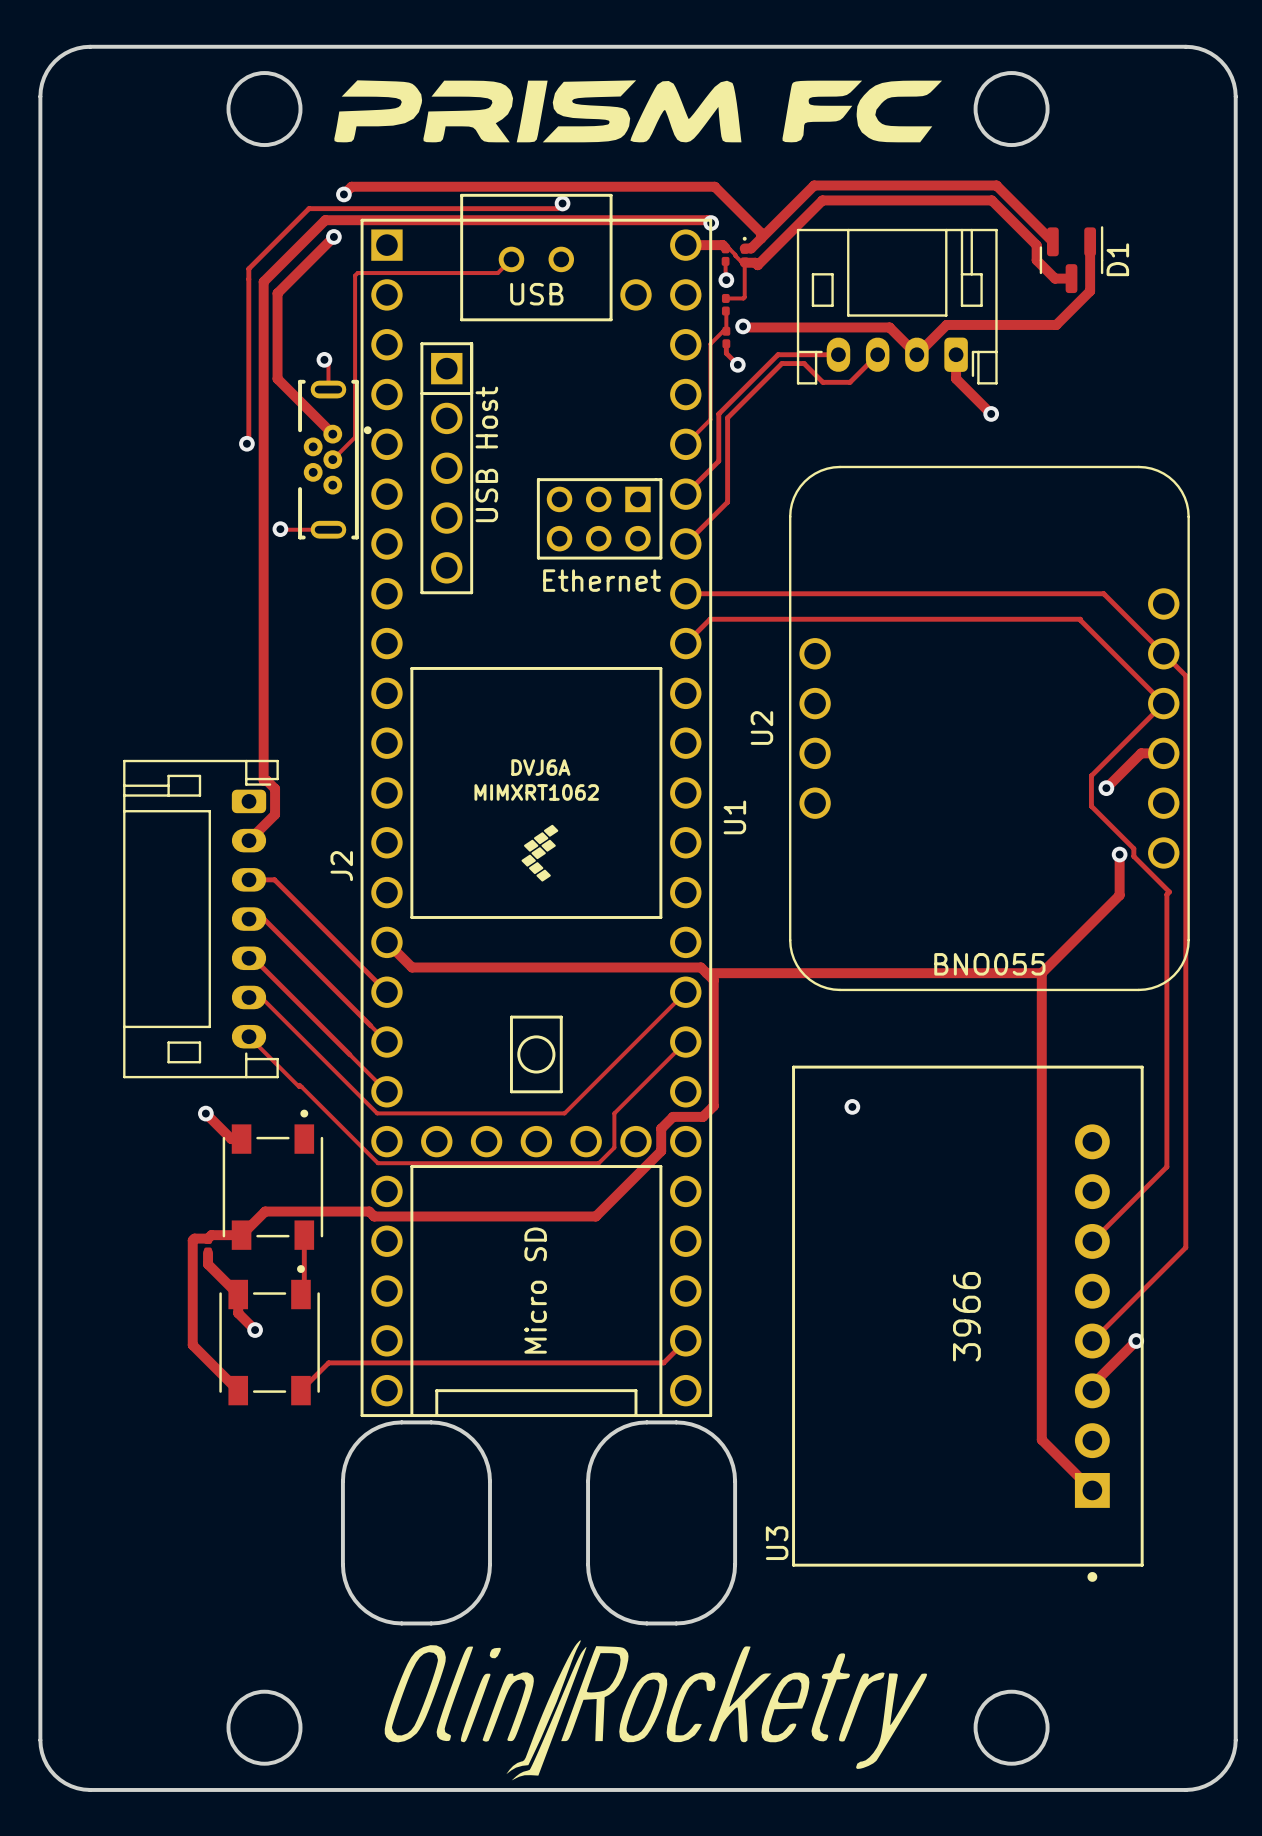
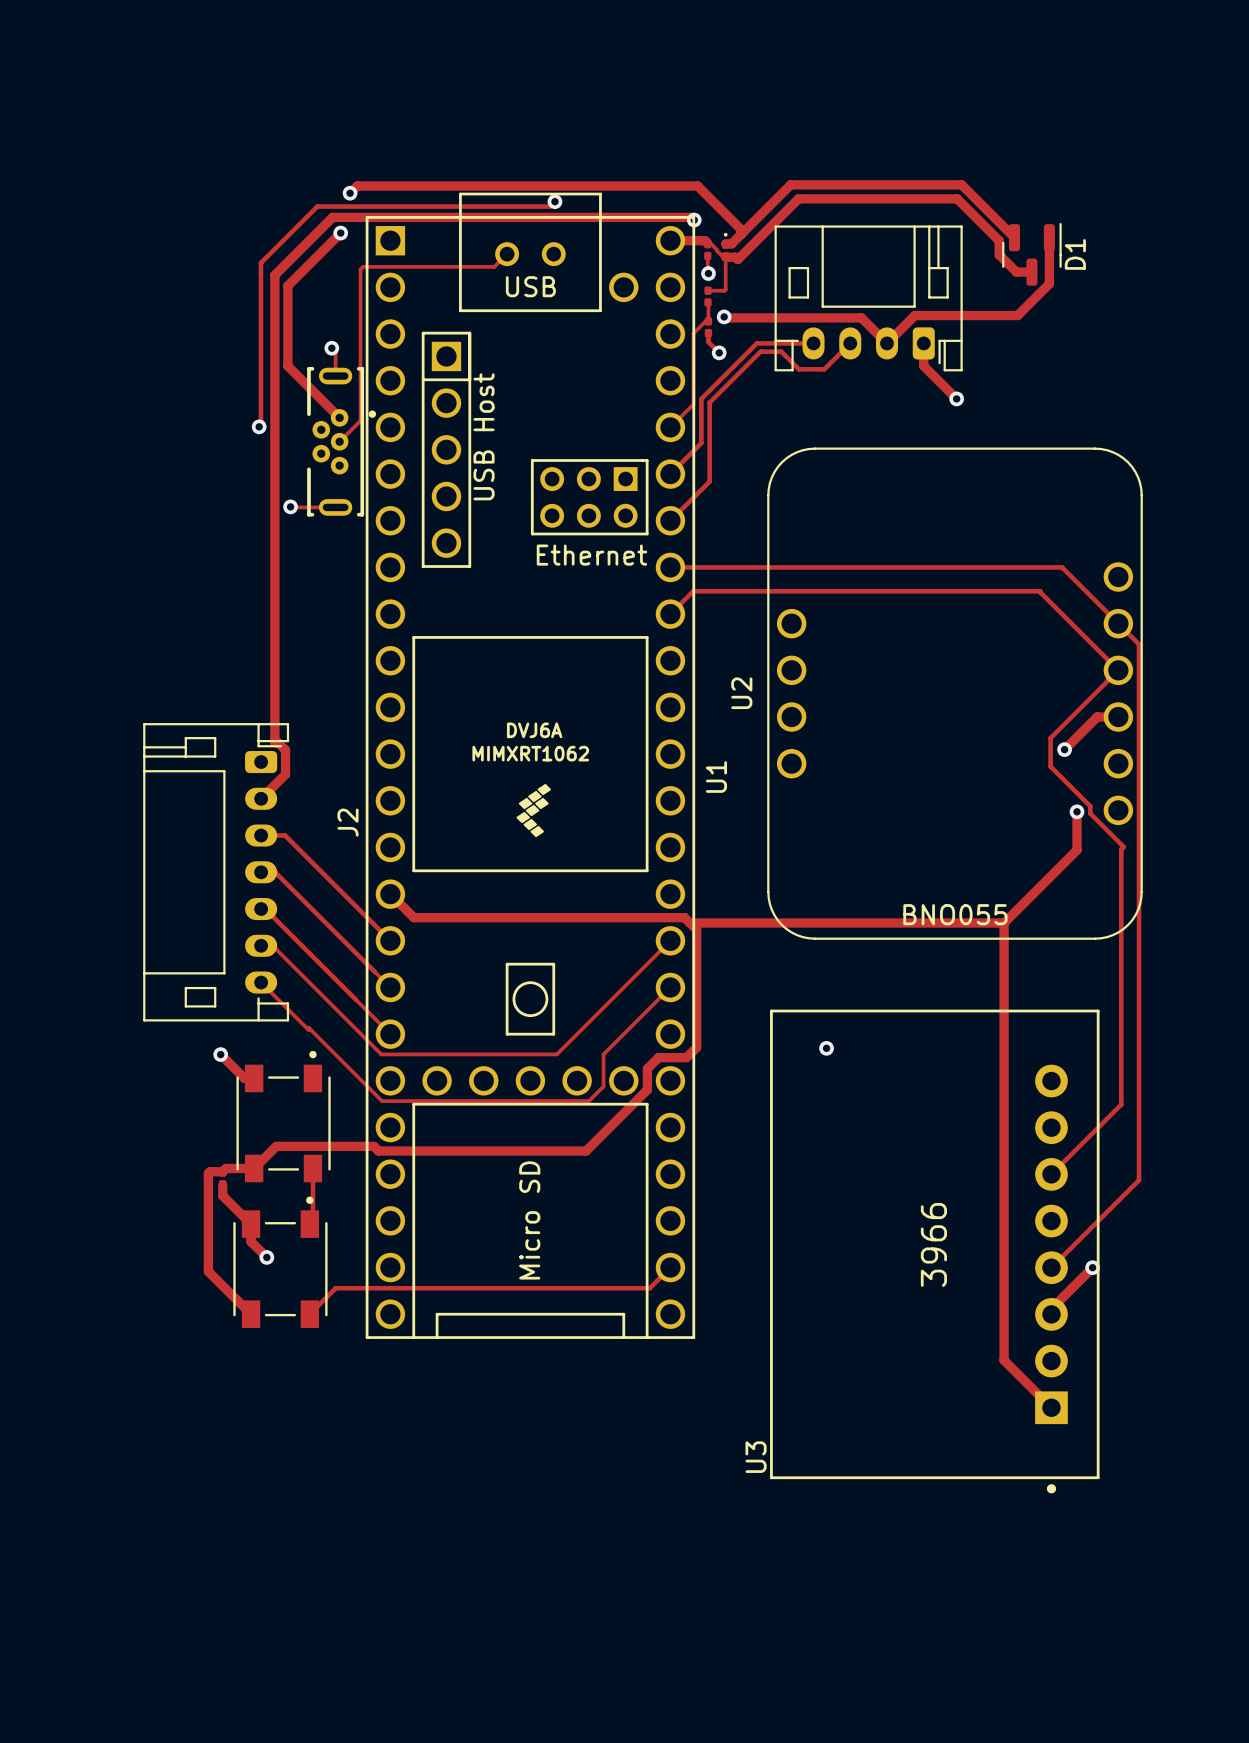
board edge: (90, 46) (1185, 46) (1198, 48) (1210, 53) (1221, 61) (1229, 71) (1234, 83) (1235, 96) (1235, 1740) (1234, 1753) (1229, 1765) (1221, 1775) (1210, 1783) (1198, 1788) (1185, 1789) (90, 1789) (77, 1788) (65, 1783) (54, 1775) (47, 1765) (42, 1753) (40, 1740) (40, 96) (44, 77) (54, 61) (71, 50) (90, 46) -> none
round board edge: [226, 71, 303, 148] -> none
round board edge: [973, 71, 1050, 148] -> none
drawing: [334, 80, 943, 143] -> none
board edge: (401, 1422) (438, 1422) (460, 1430) (477, 1445) (487, 1466) (490, 1481) (490, 1564) (487, 1579) (482, 1594) (472, 1606) (460, 1615) (446, 1621) (401, 1623) (379, 1619) (365, 1611) (355, 1600) (344, 1579) (342, 1564) (342, 1481) (347, 1458) (355, 1445) (365, 1434) (379, 1426) (401, 1422) -> none
board edge: (646, 1422) (683, 1422) (705, 1430) (722, 1445) (733, 1466) (735, 1481) (735, 1564) (733, 1579) (727, 1594) (717, 1606) (705, 1615) (691, 1621) (646, 1623) (624, 1619) (605, 1606) (595, 1594) (590, 1579) (588, 1564) (588, 1481) (592, 1458) (600, 1445) (611, 1434) (624, 1426) (646, 1422) -> none
drawing: [384, 1640, 927, 1781] -> none
round board edge: [226, 1689, 303, 1766] -> none
round board edge: [973, 1689, 1050, 1766] -> none

